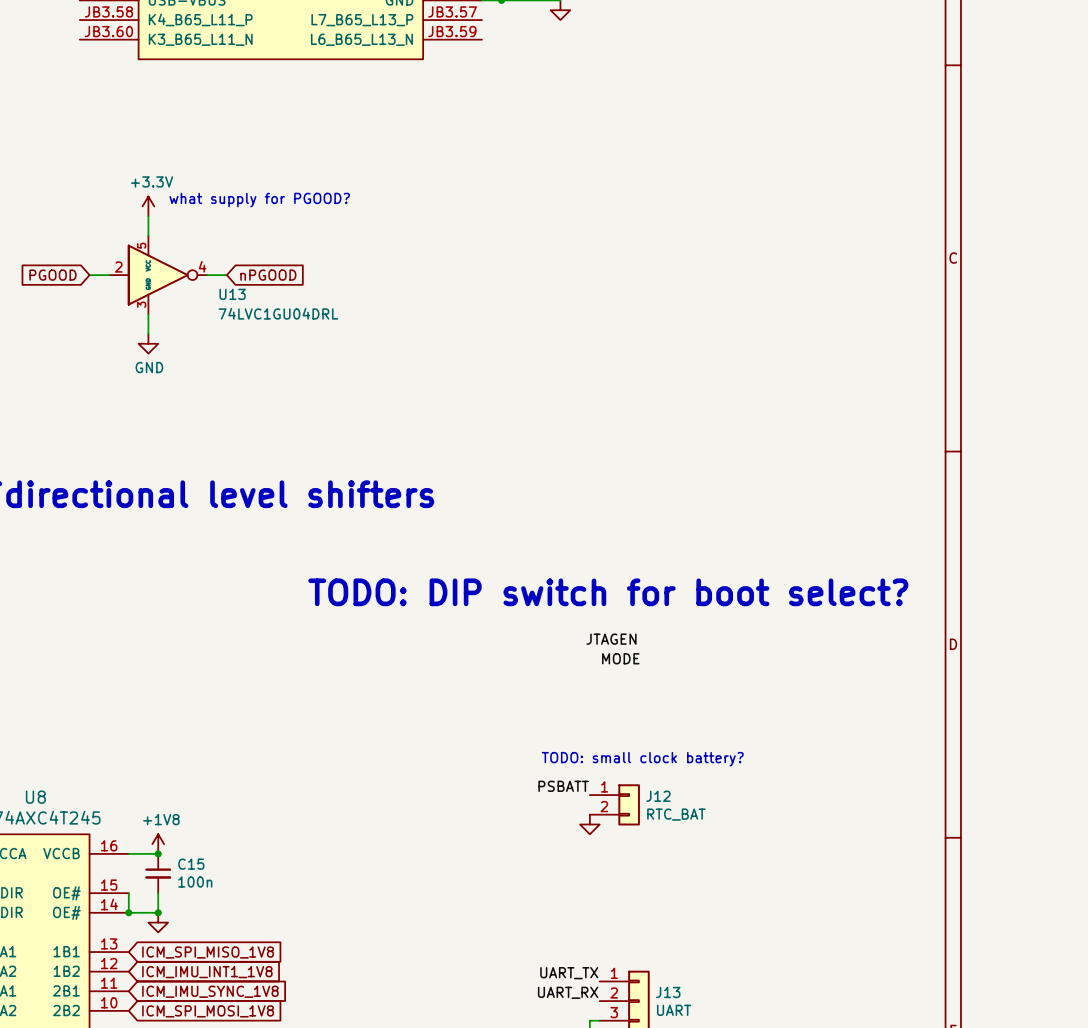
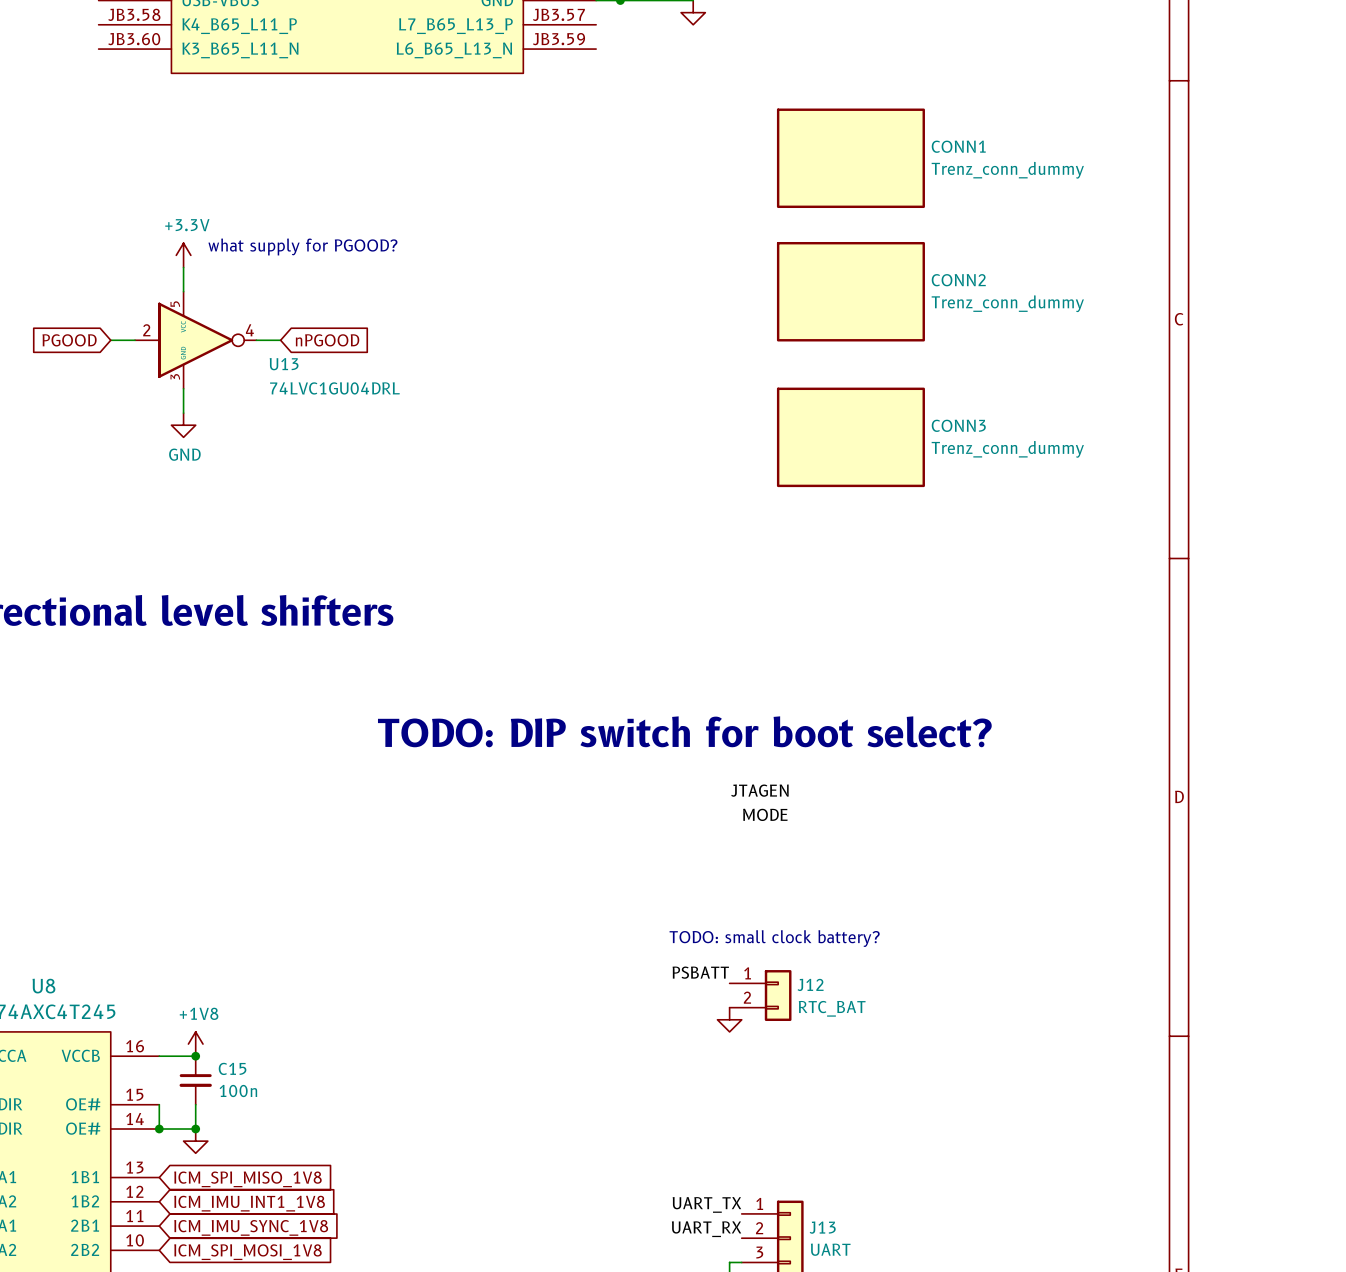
CONN1: none -> Trenz_conn_dummy (850, 158)
CONN2: none -> Trenz_conn_dummy (850, 291)
CONN3: none -> Trenz_conn_dummy (850, 437)

